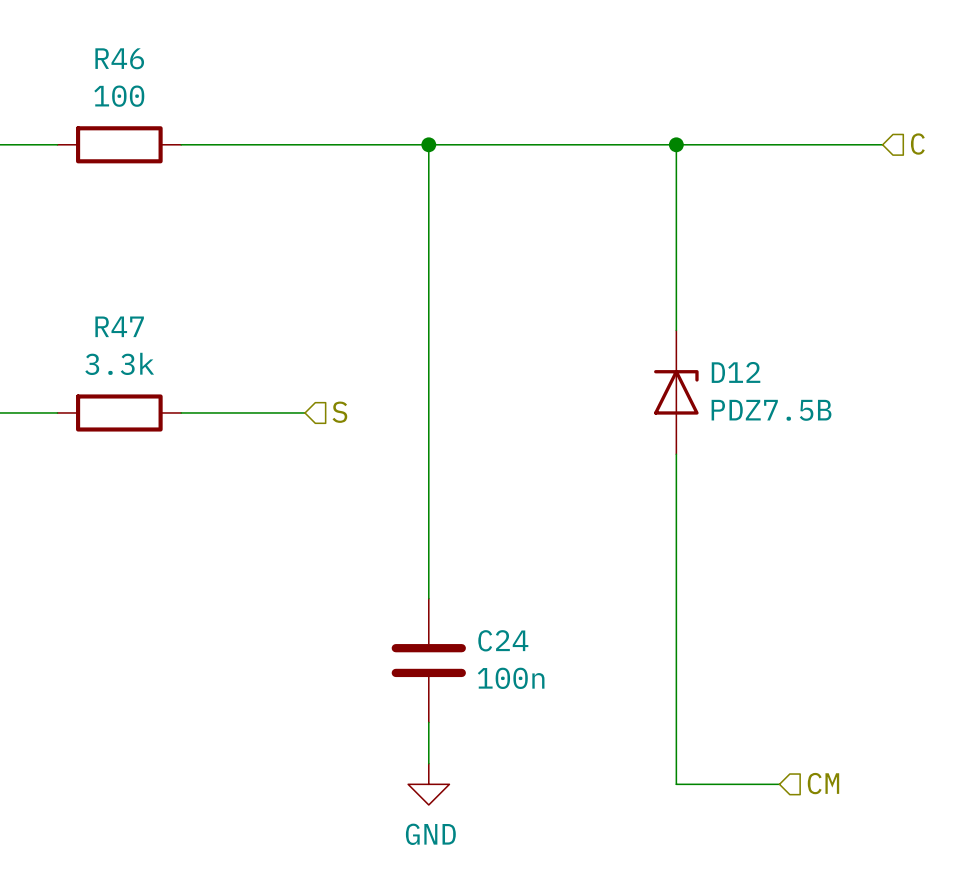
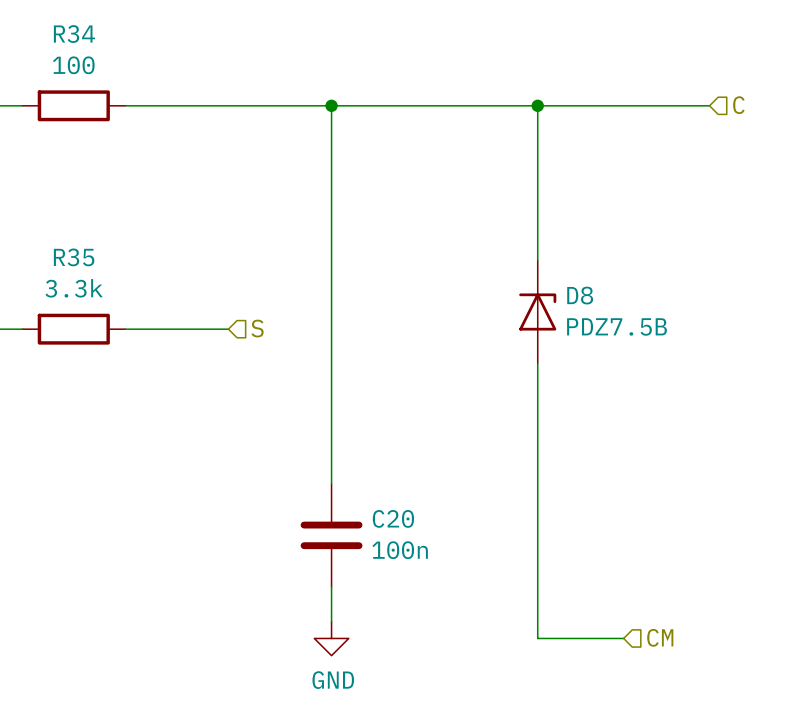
R46 name: R46 (119, 58) -> R34 (74, 34)
R47 name: R47 (119, 326) -> R35 (74, 257)
D12 name: D12 (736, 372) -> D8 (580, 295)
C24 name: C24 (503, 640) -> C20 (393, 518)

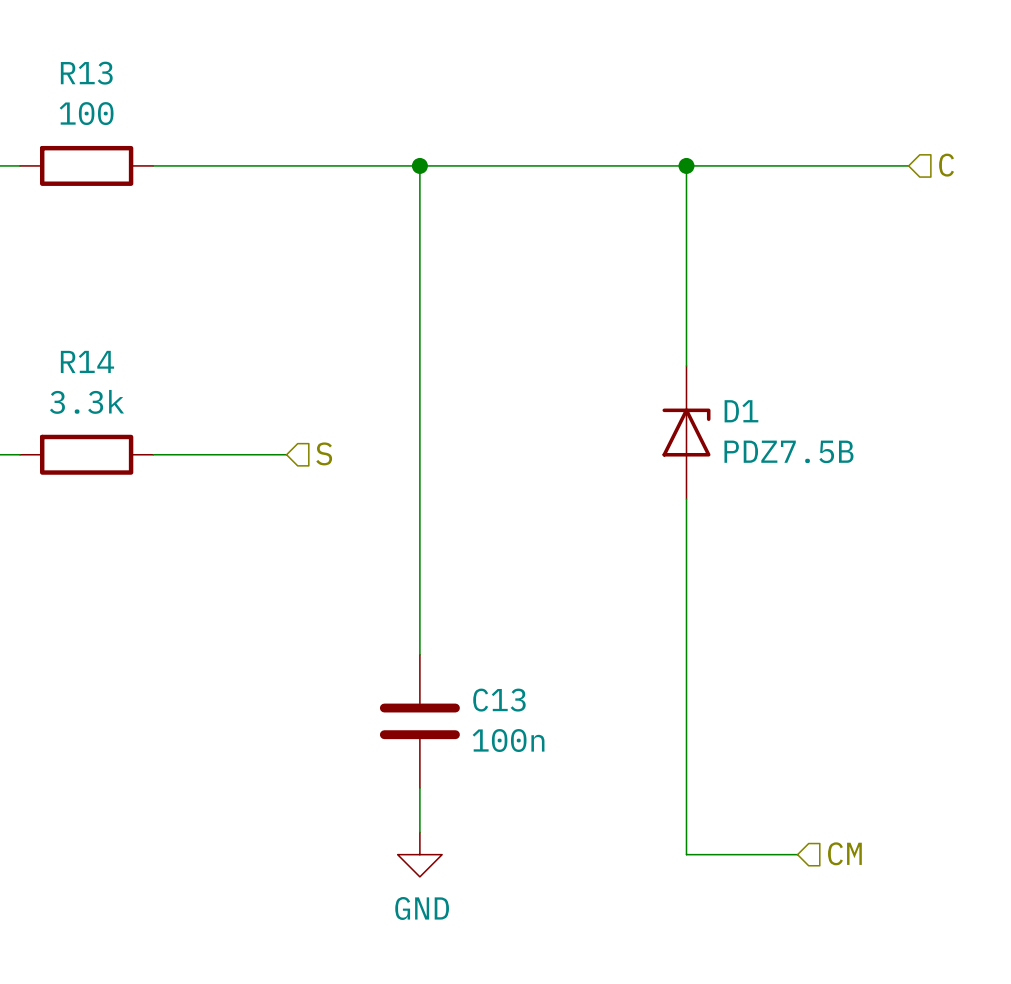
R34 name: R34 (74, 34) -> R13 (86, 73)
R35 name: R35 (74, 257) -> R14 (87, 361)
D8 name: D8 (580, 295) -> D1 (741, 411)
C20 name: C20 (393, 518) -> C13 (499, 700)

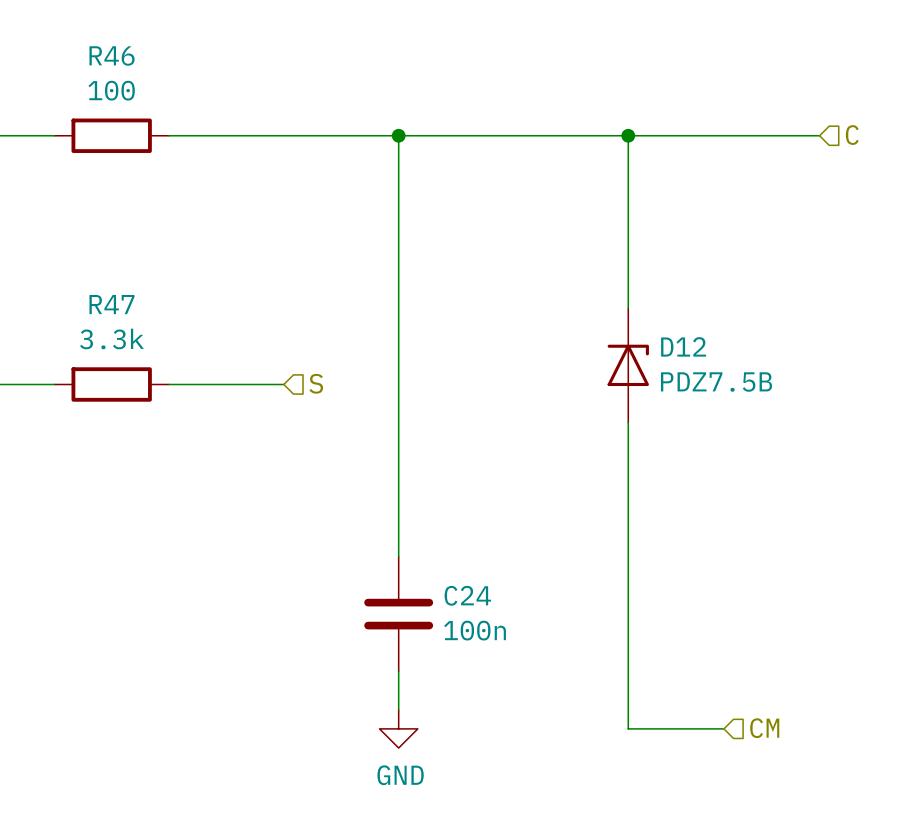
R13 name: R13 (86, 73) -> R46 (112, 55)
R14 name: R14 (87, 361) -> R47 (111, 304)
D1 name: D1 (741, 411) -> D12 (683, 346)
C13 name: C13 (499, 700) -> C24 (467, 595)

